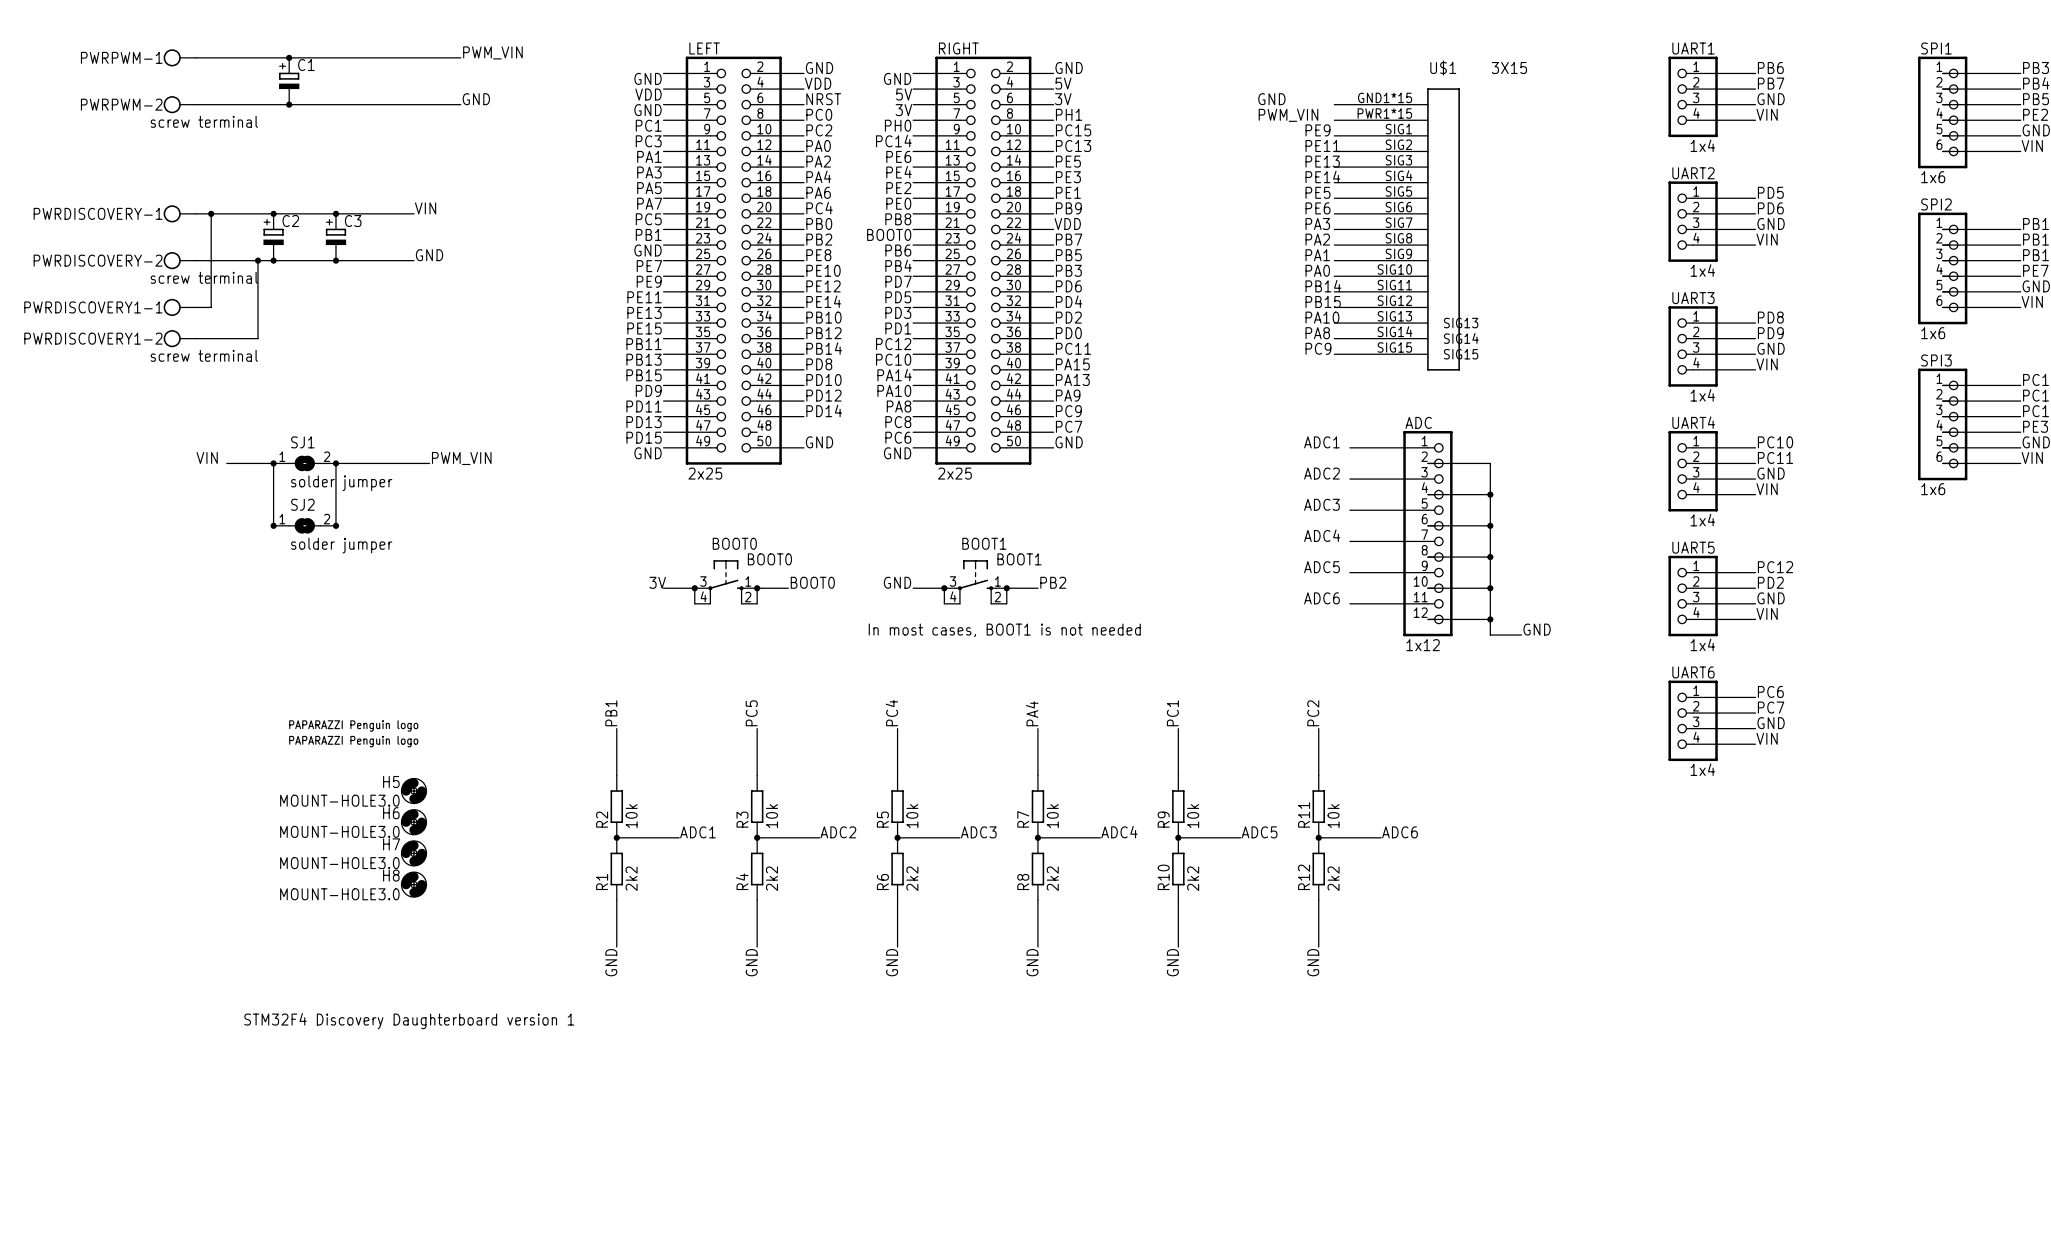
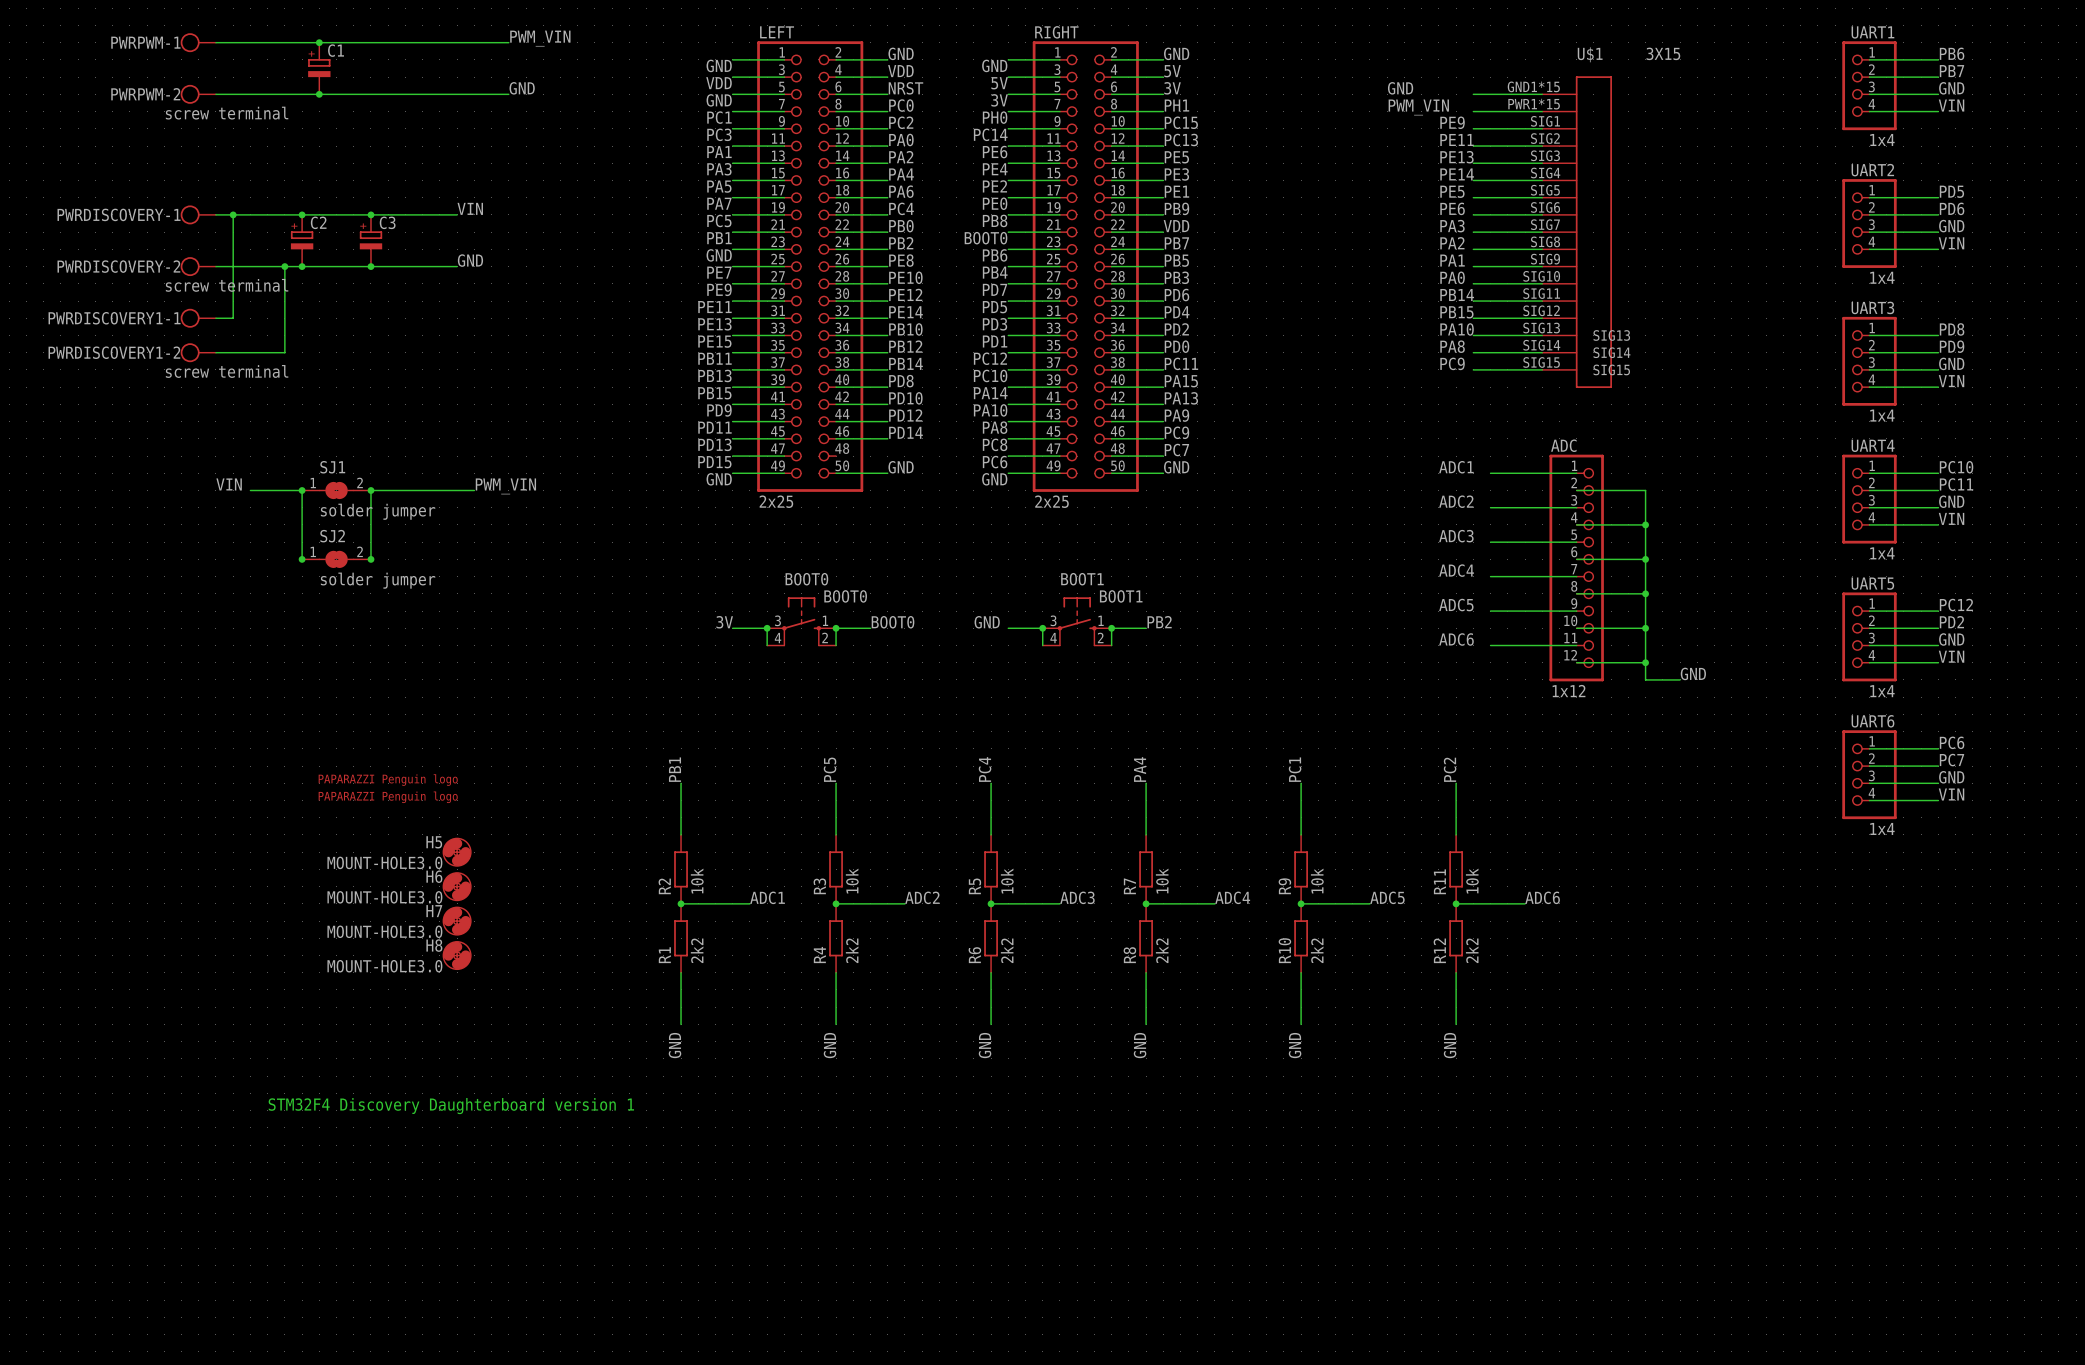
text: In most cases, BOOT1 is not needed (1004, 630) -> none

